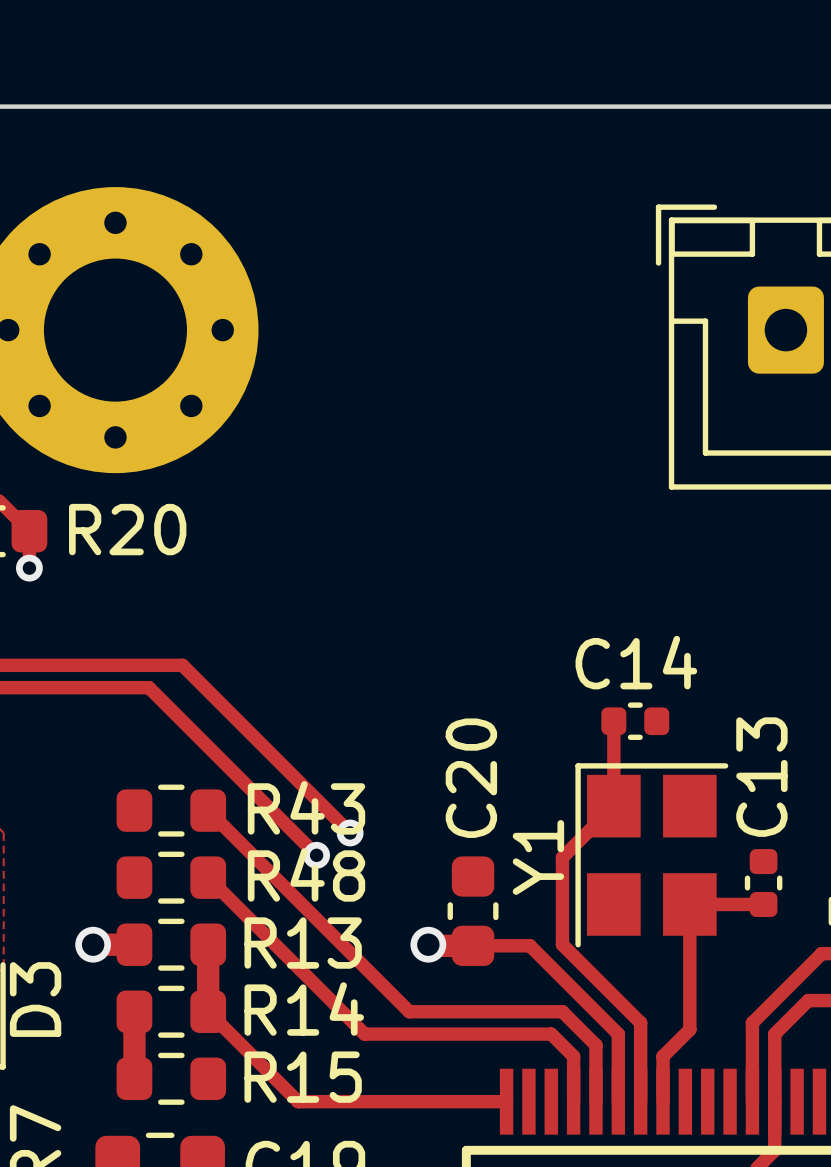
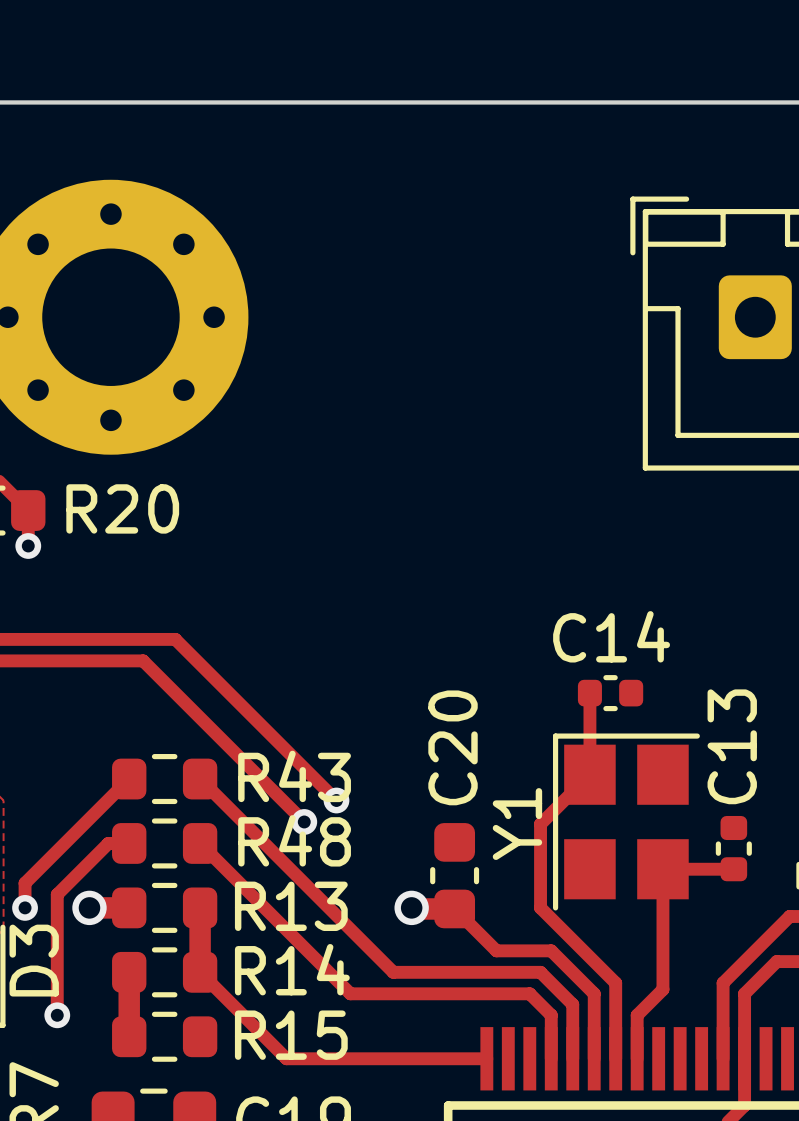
track: none -> (129, 779) (25, 883) (25, 907)
track: none -> (129, 843) (108, 843) (57, 894) (57, 1015)
via: none -> (25, 907)
track: (473, 945) (530, 945) (573, 989) -> (454, 908) (496, 950) (551, 950)
via: none -> (57, 1015)

